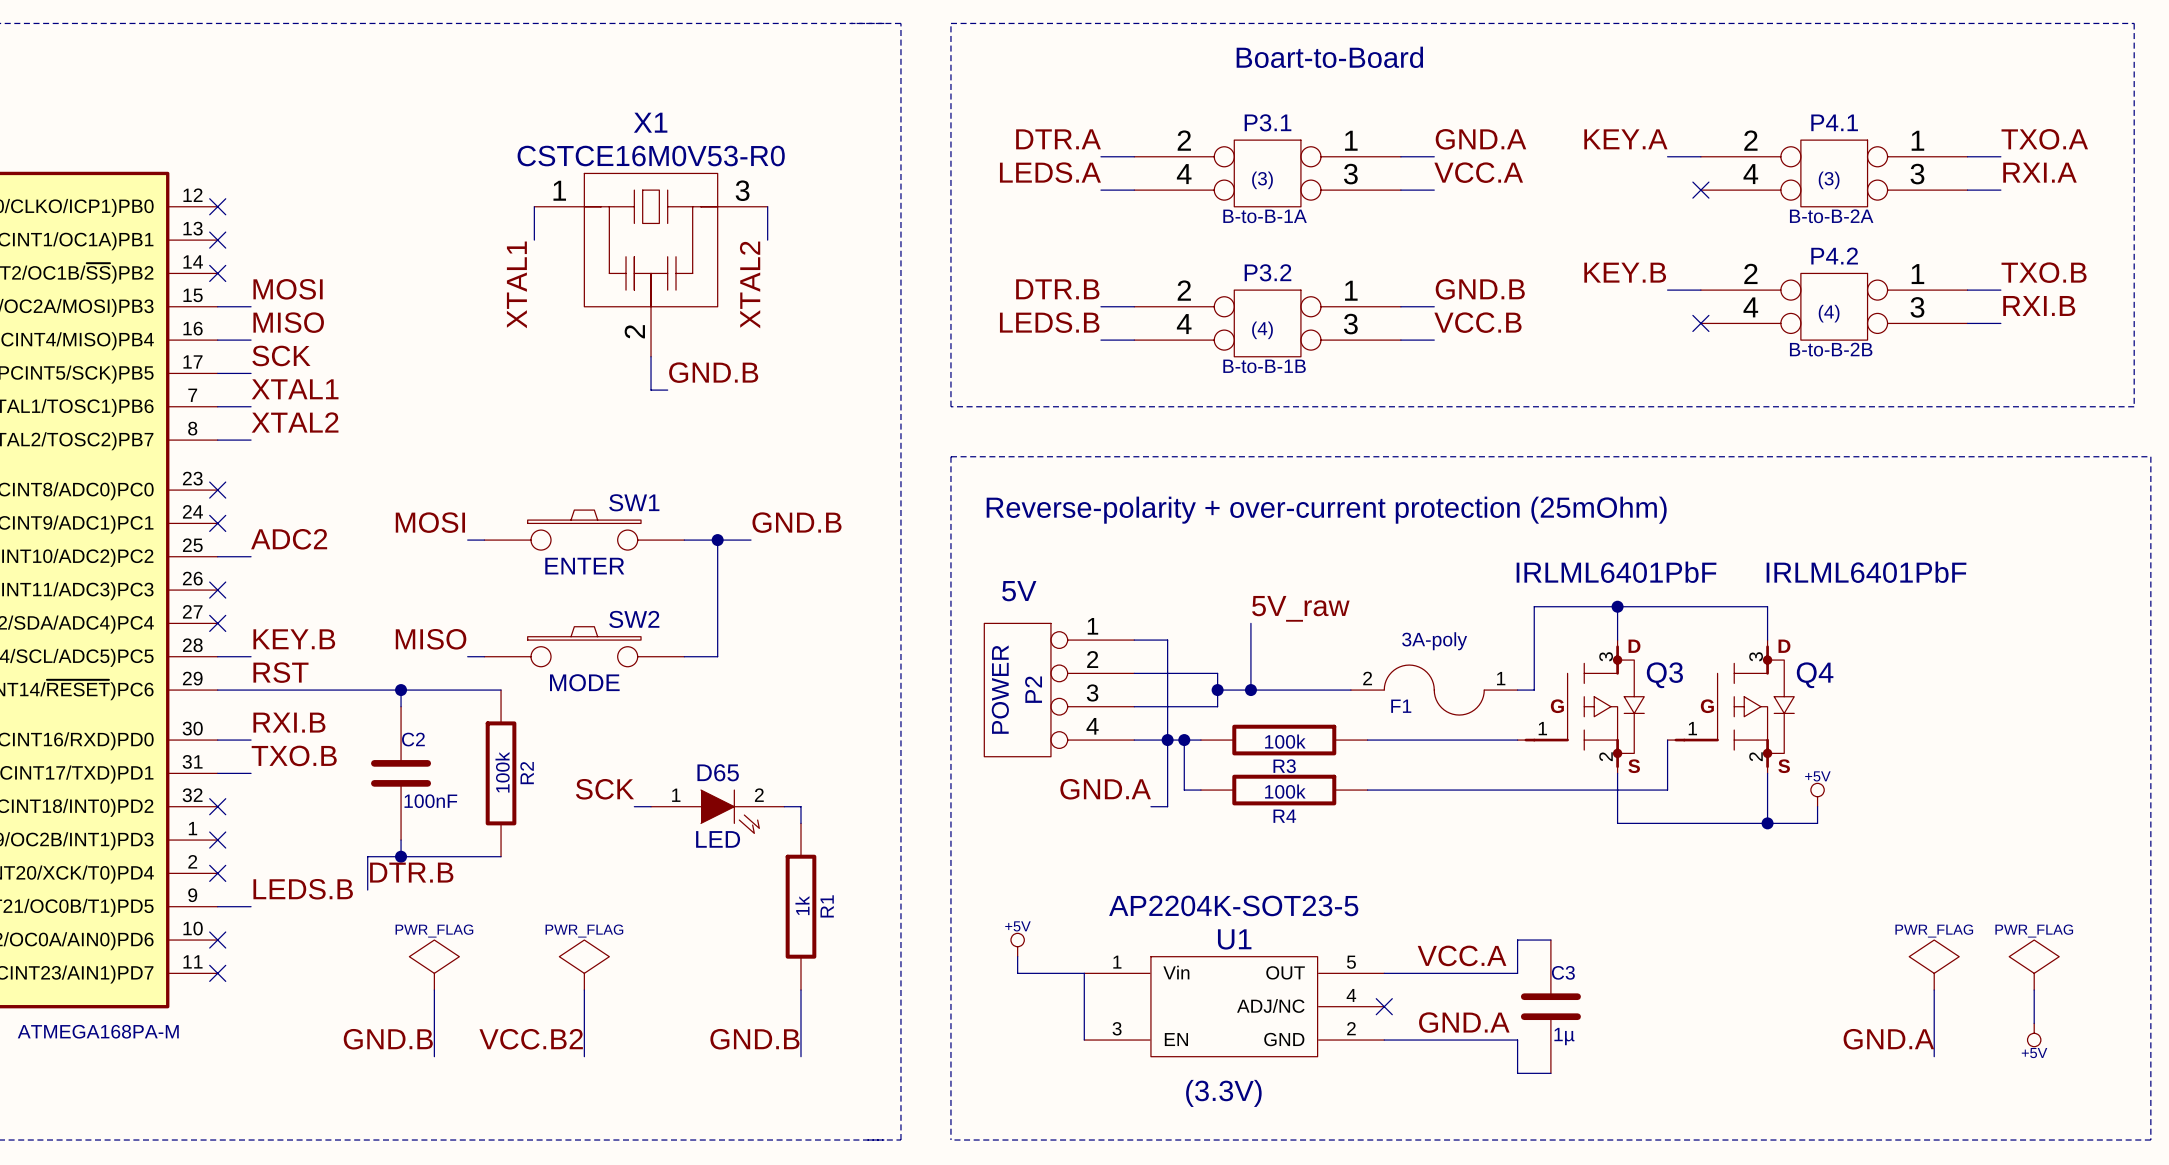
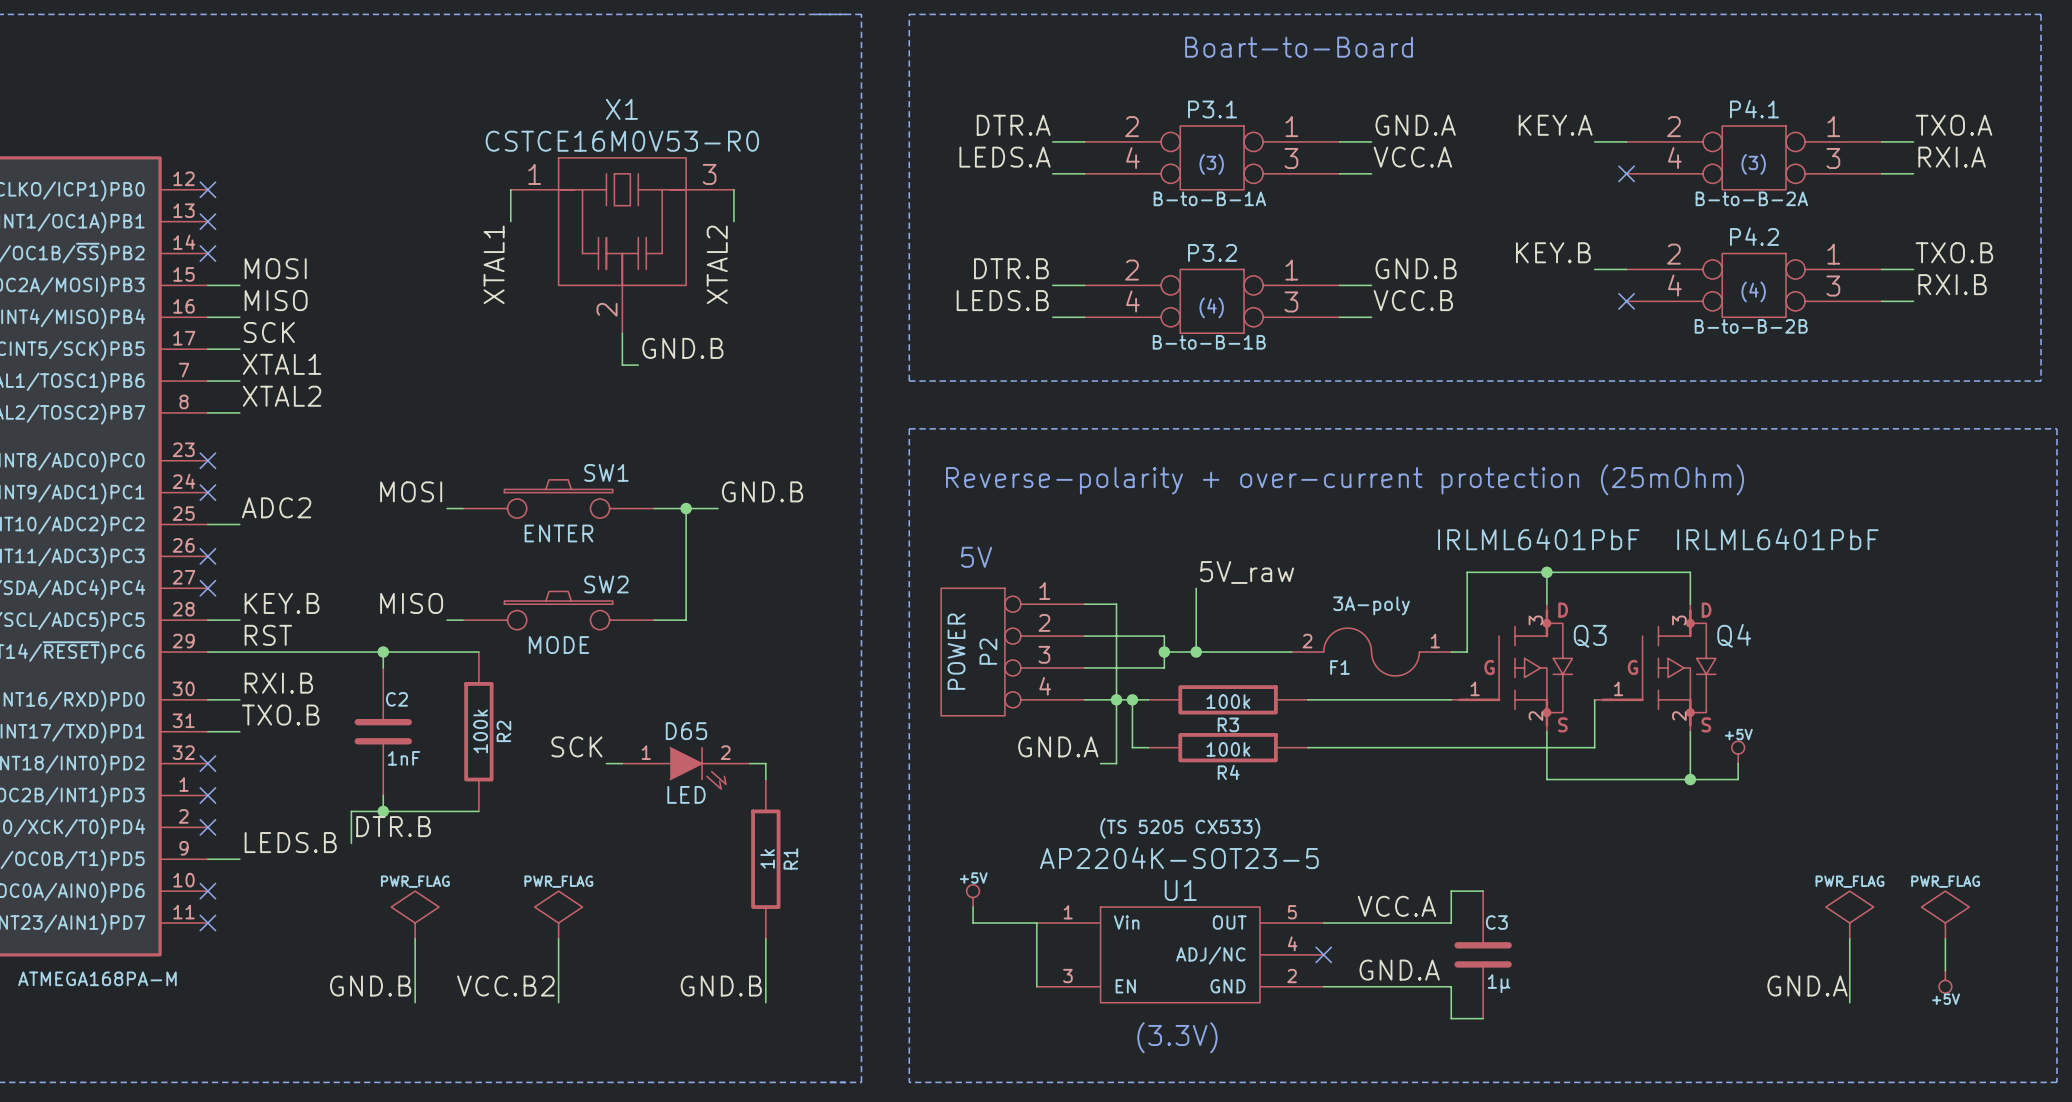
C2 value: 100nF (430, 801) -> 1nF (404, 758)
U1 text: none -> (TS 5205 CX533) (1180, 828)

